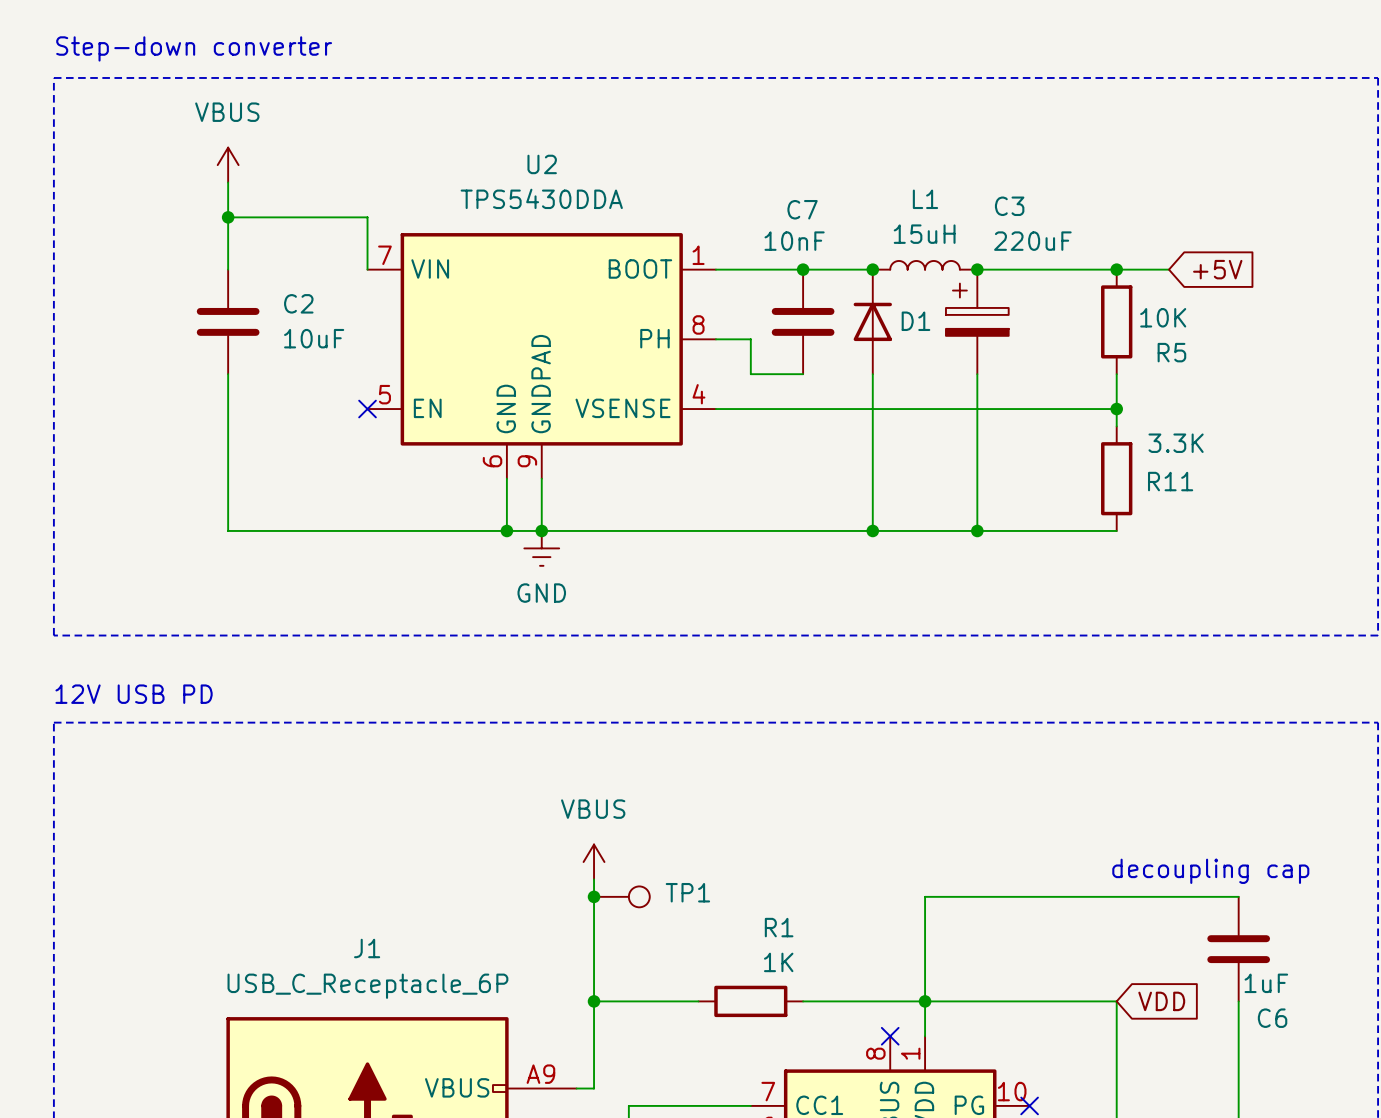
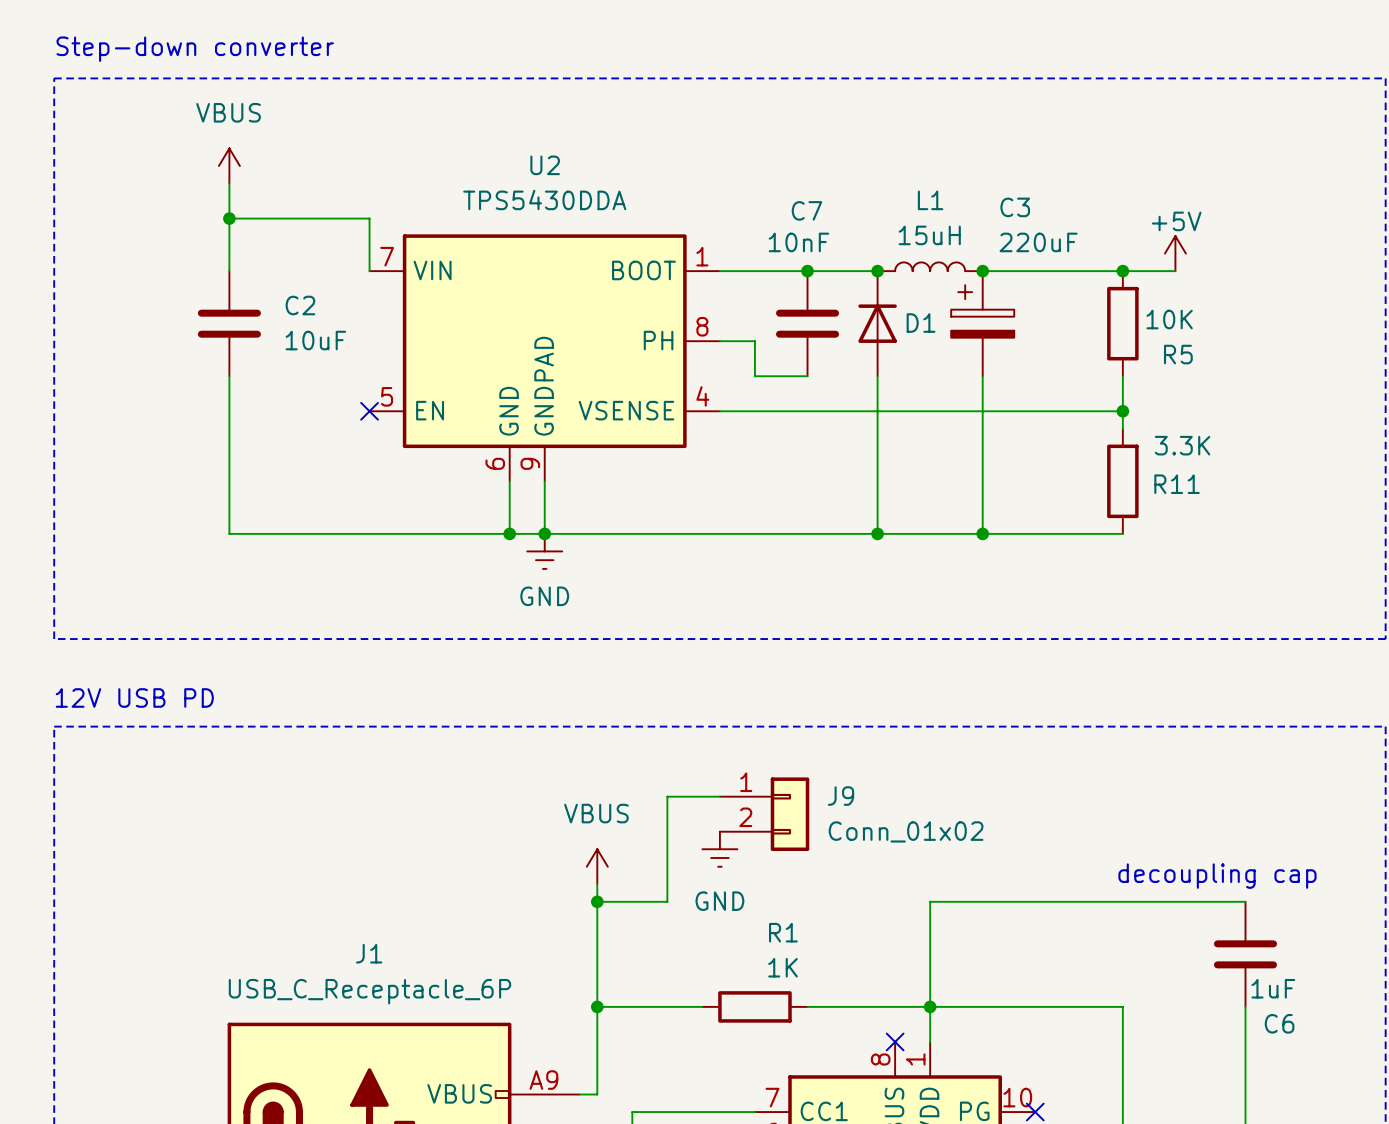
power symbol: none -> +5V (1175, 253)
global label: +5V (1217, 269) -> none
wire: none -> (719, 796) (667, 796) (667, 901) (597, 901)
J9: none -> Conn_01x02 (764, 814)
power symbol: none -> GND (719, 849)
TP1: (621, 896) -> none
global label: VDD (1161, 1001) -> none

